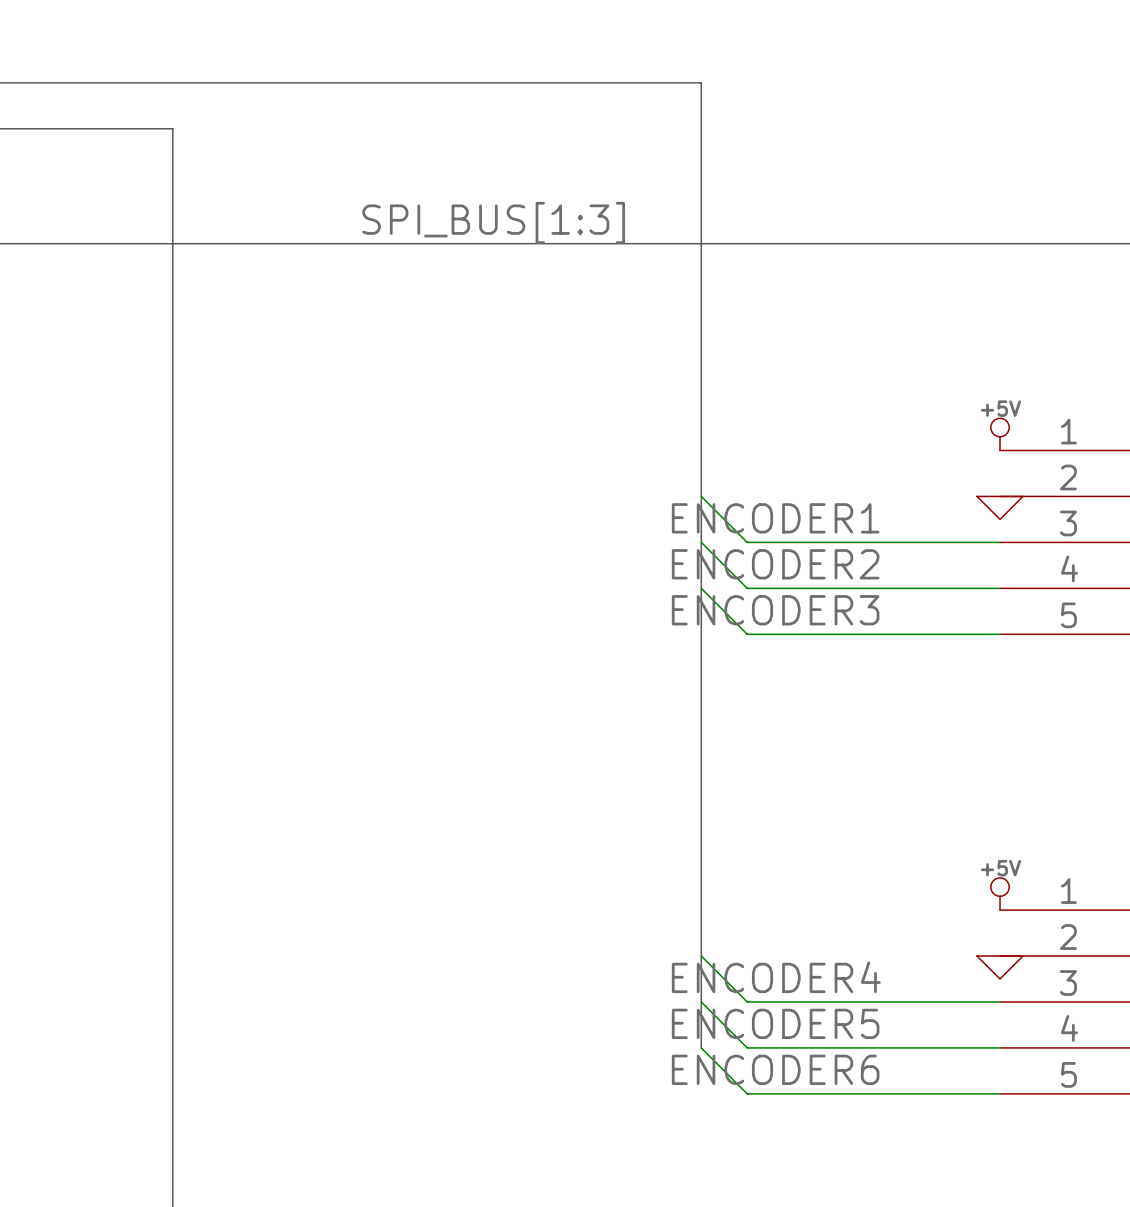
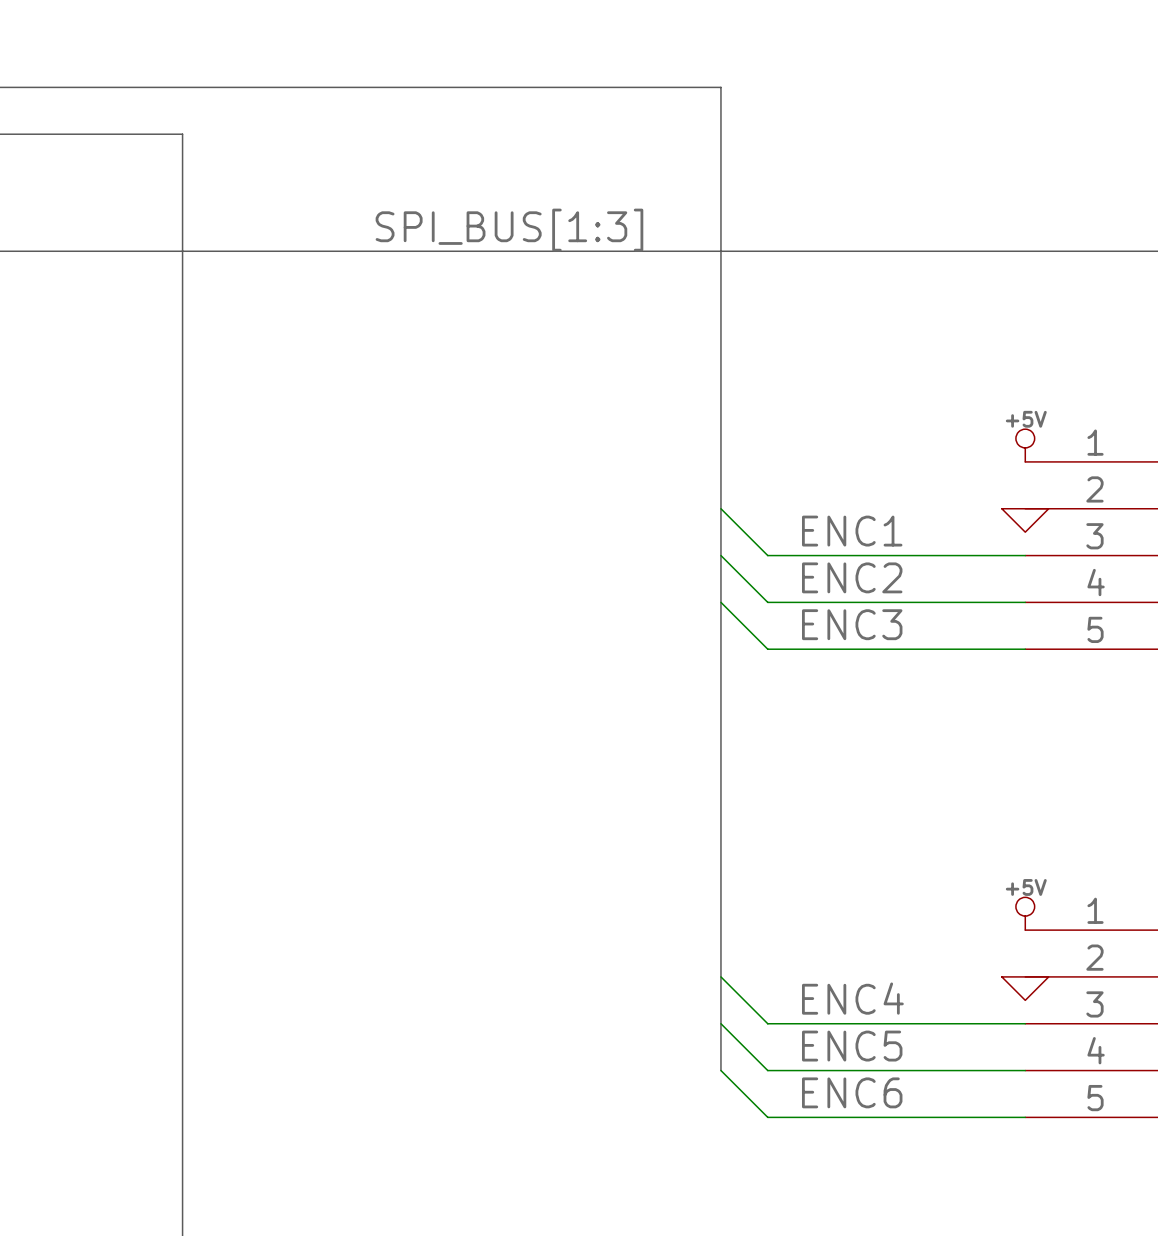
label: ENCODER1 (775, 518) -> ENC1 (852, 531)
label: ENCODER2 (775, 564) -> ENC2 (852, 577)
label: ENCODER3 (775, 610) -> ENC3 (852, 624)
label: ENCODER4 (776, 977) -> ENC4 (852, 998)
label: ENCODER5 (775, 1023) -> ENC5 (852, 1046)
label: ENCODER6 (775, 1069) -> ENC6 (852, 1092)

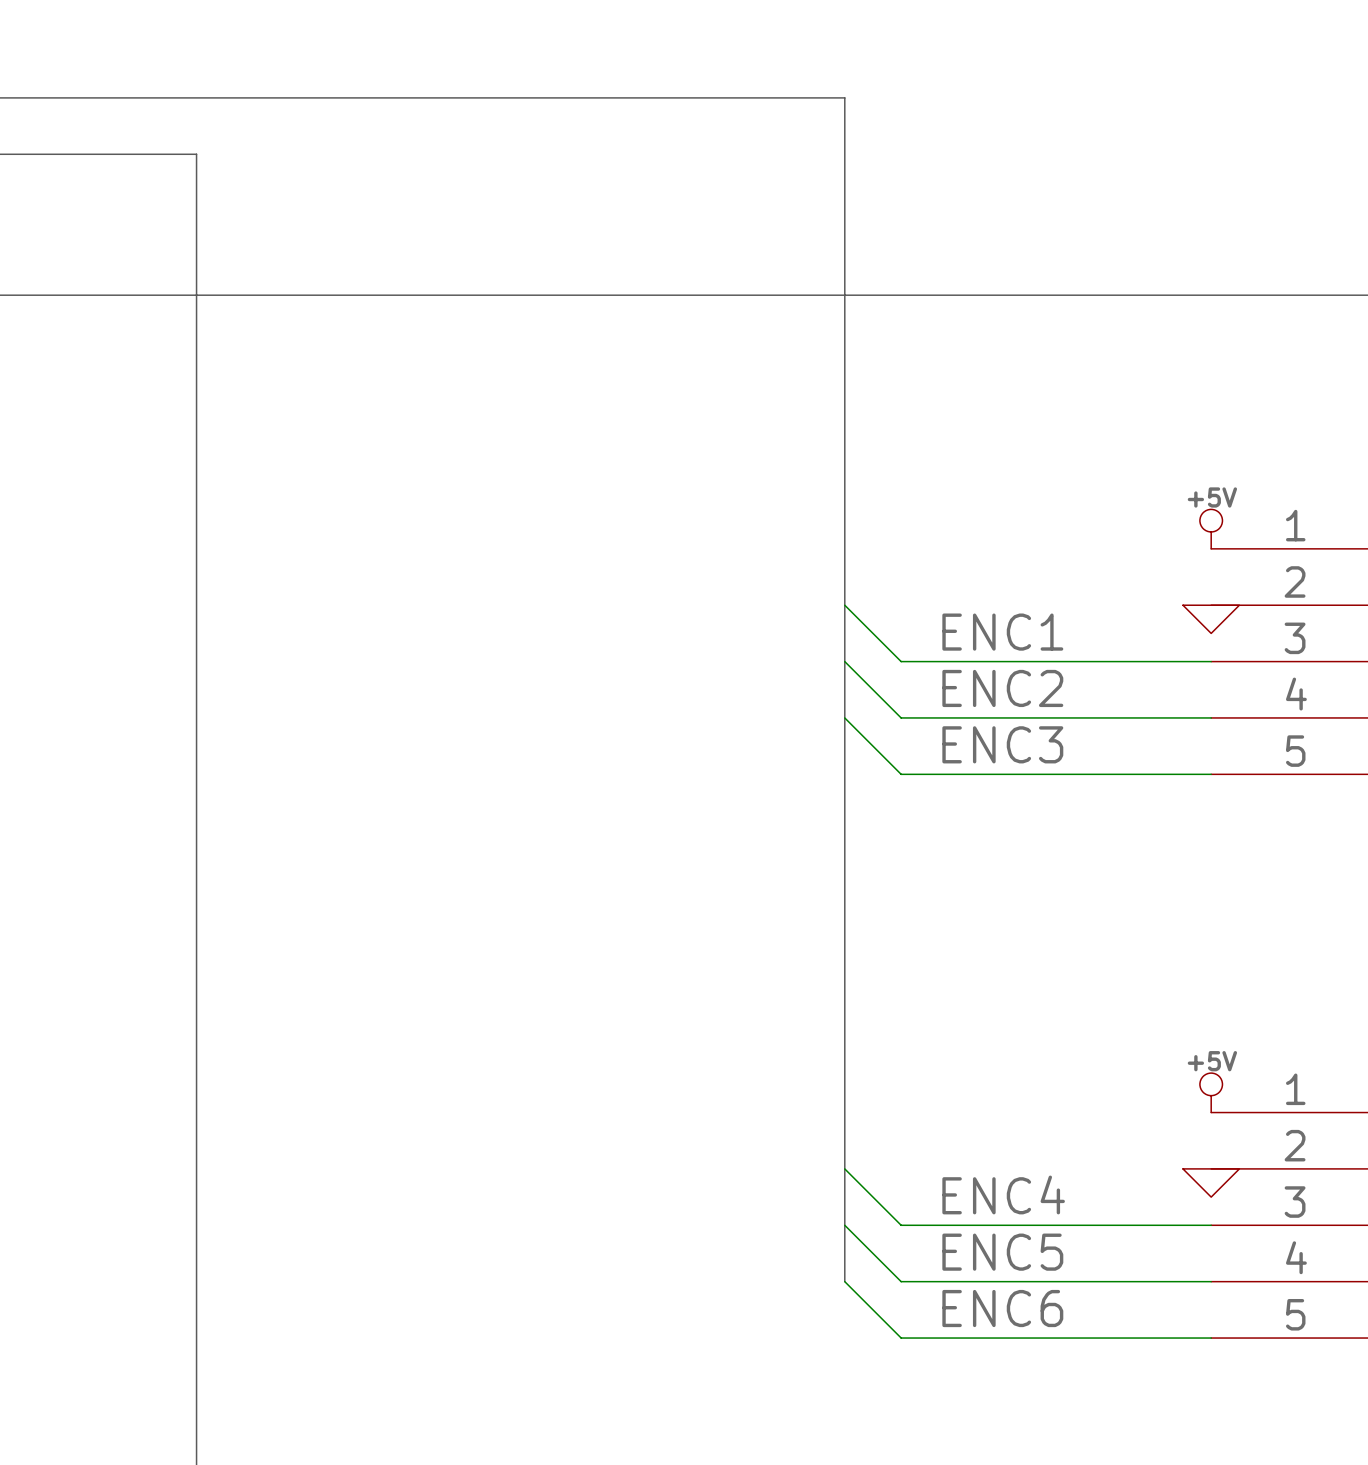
label: SPI_BUS[1:3] (509, 230) -> none

